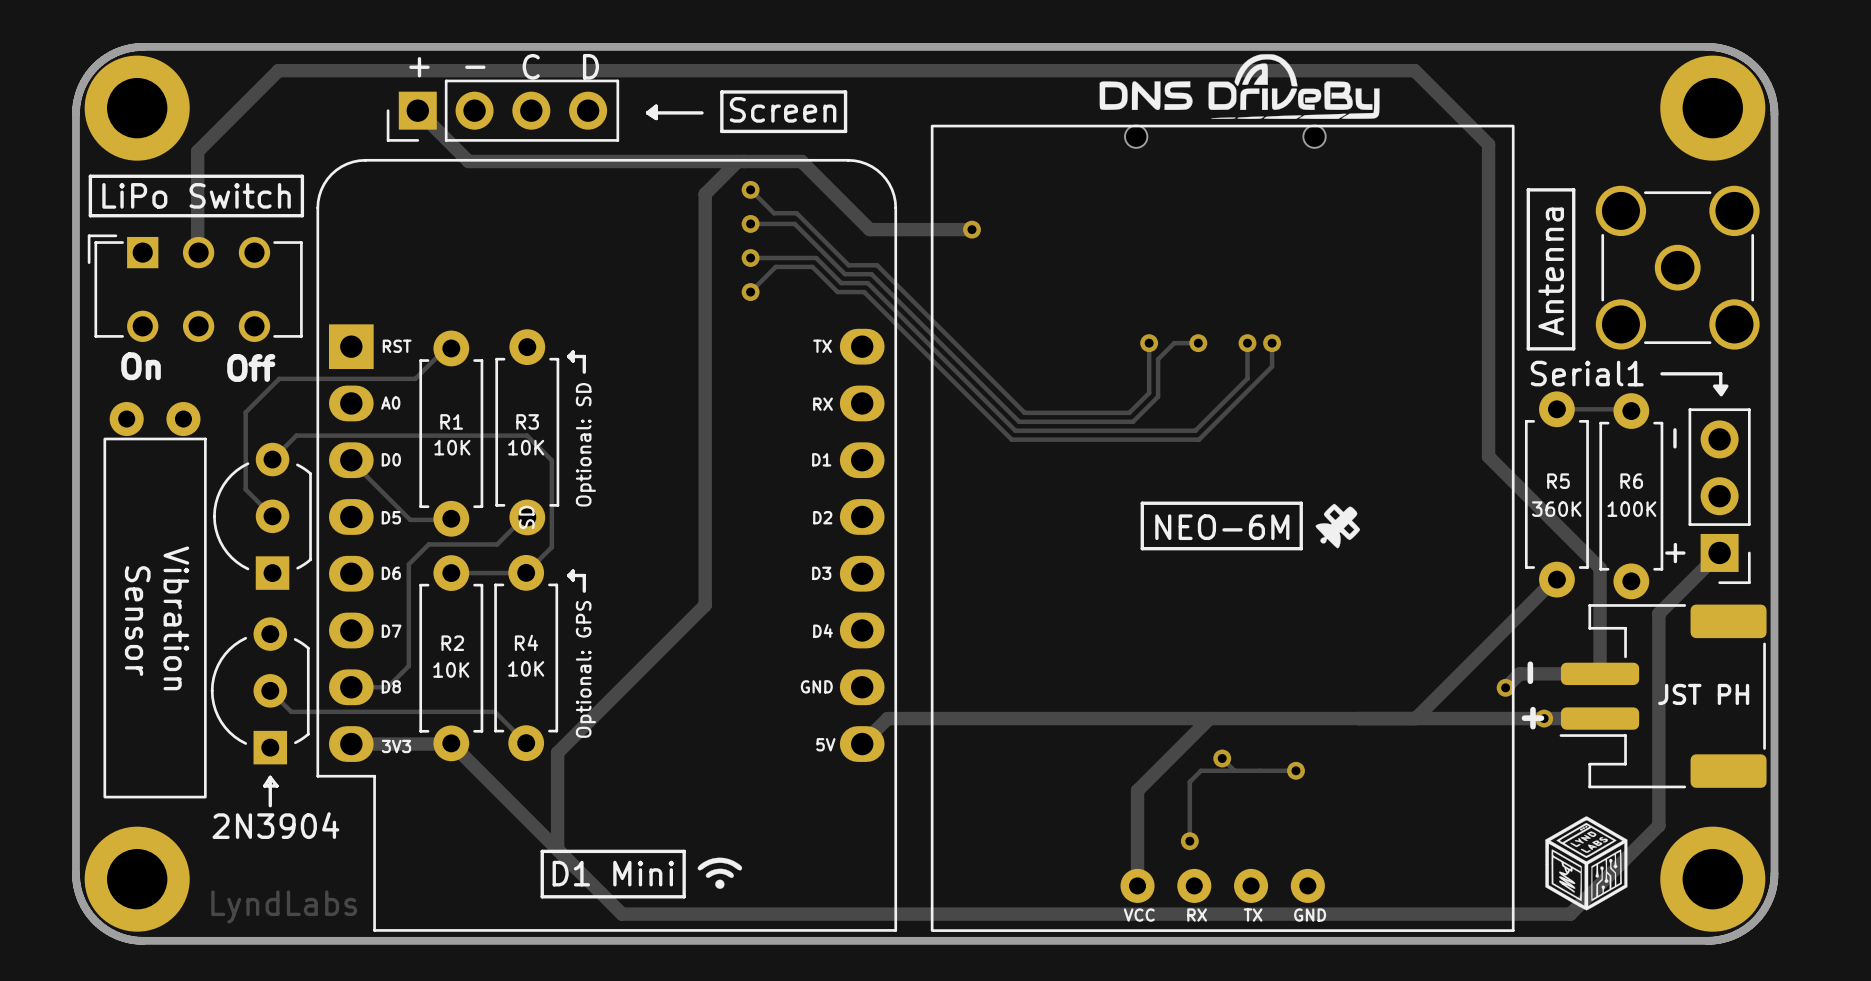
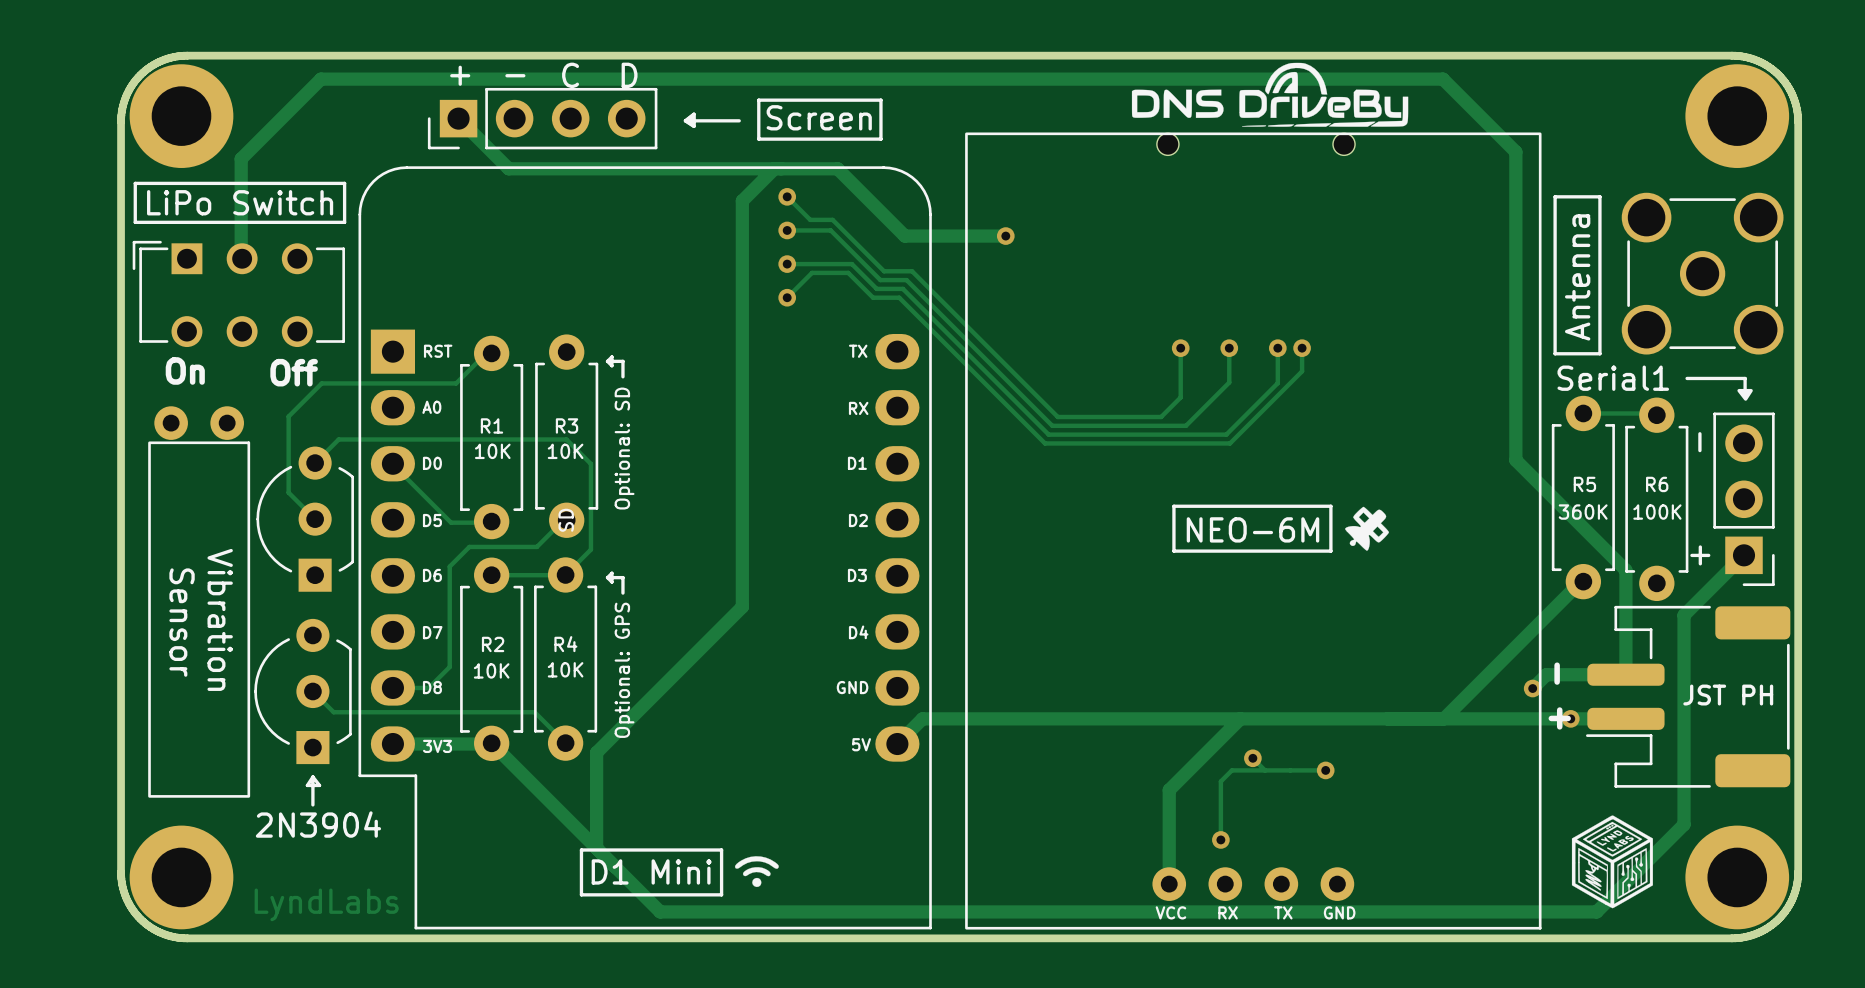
track: (1198, 343) (1174, 343) (1158, 359) (1158, 396) (1133, 421) -> (1229, 348) (1229, 382) (1185, 425) (1164, 425)

